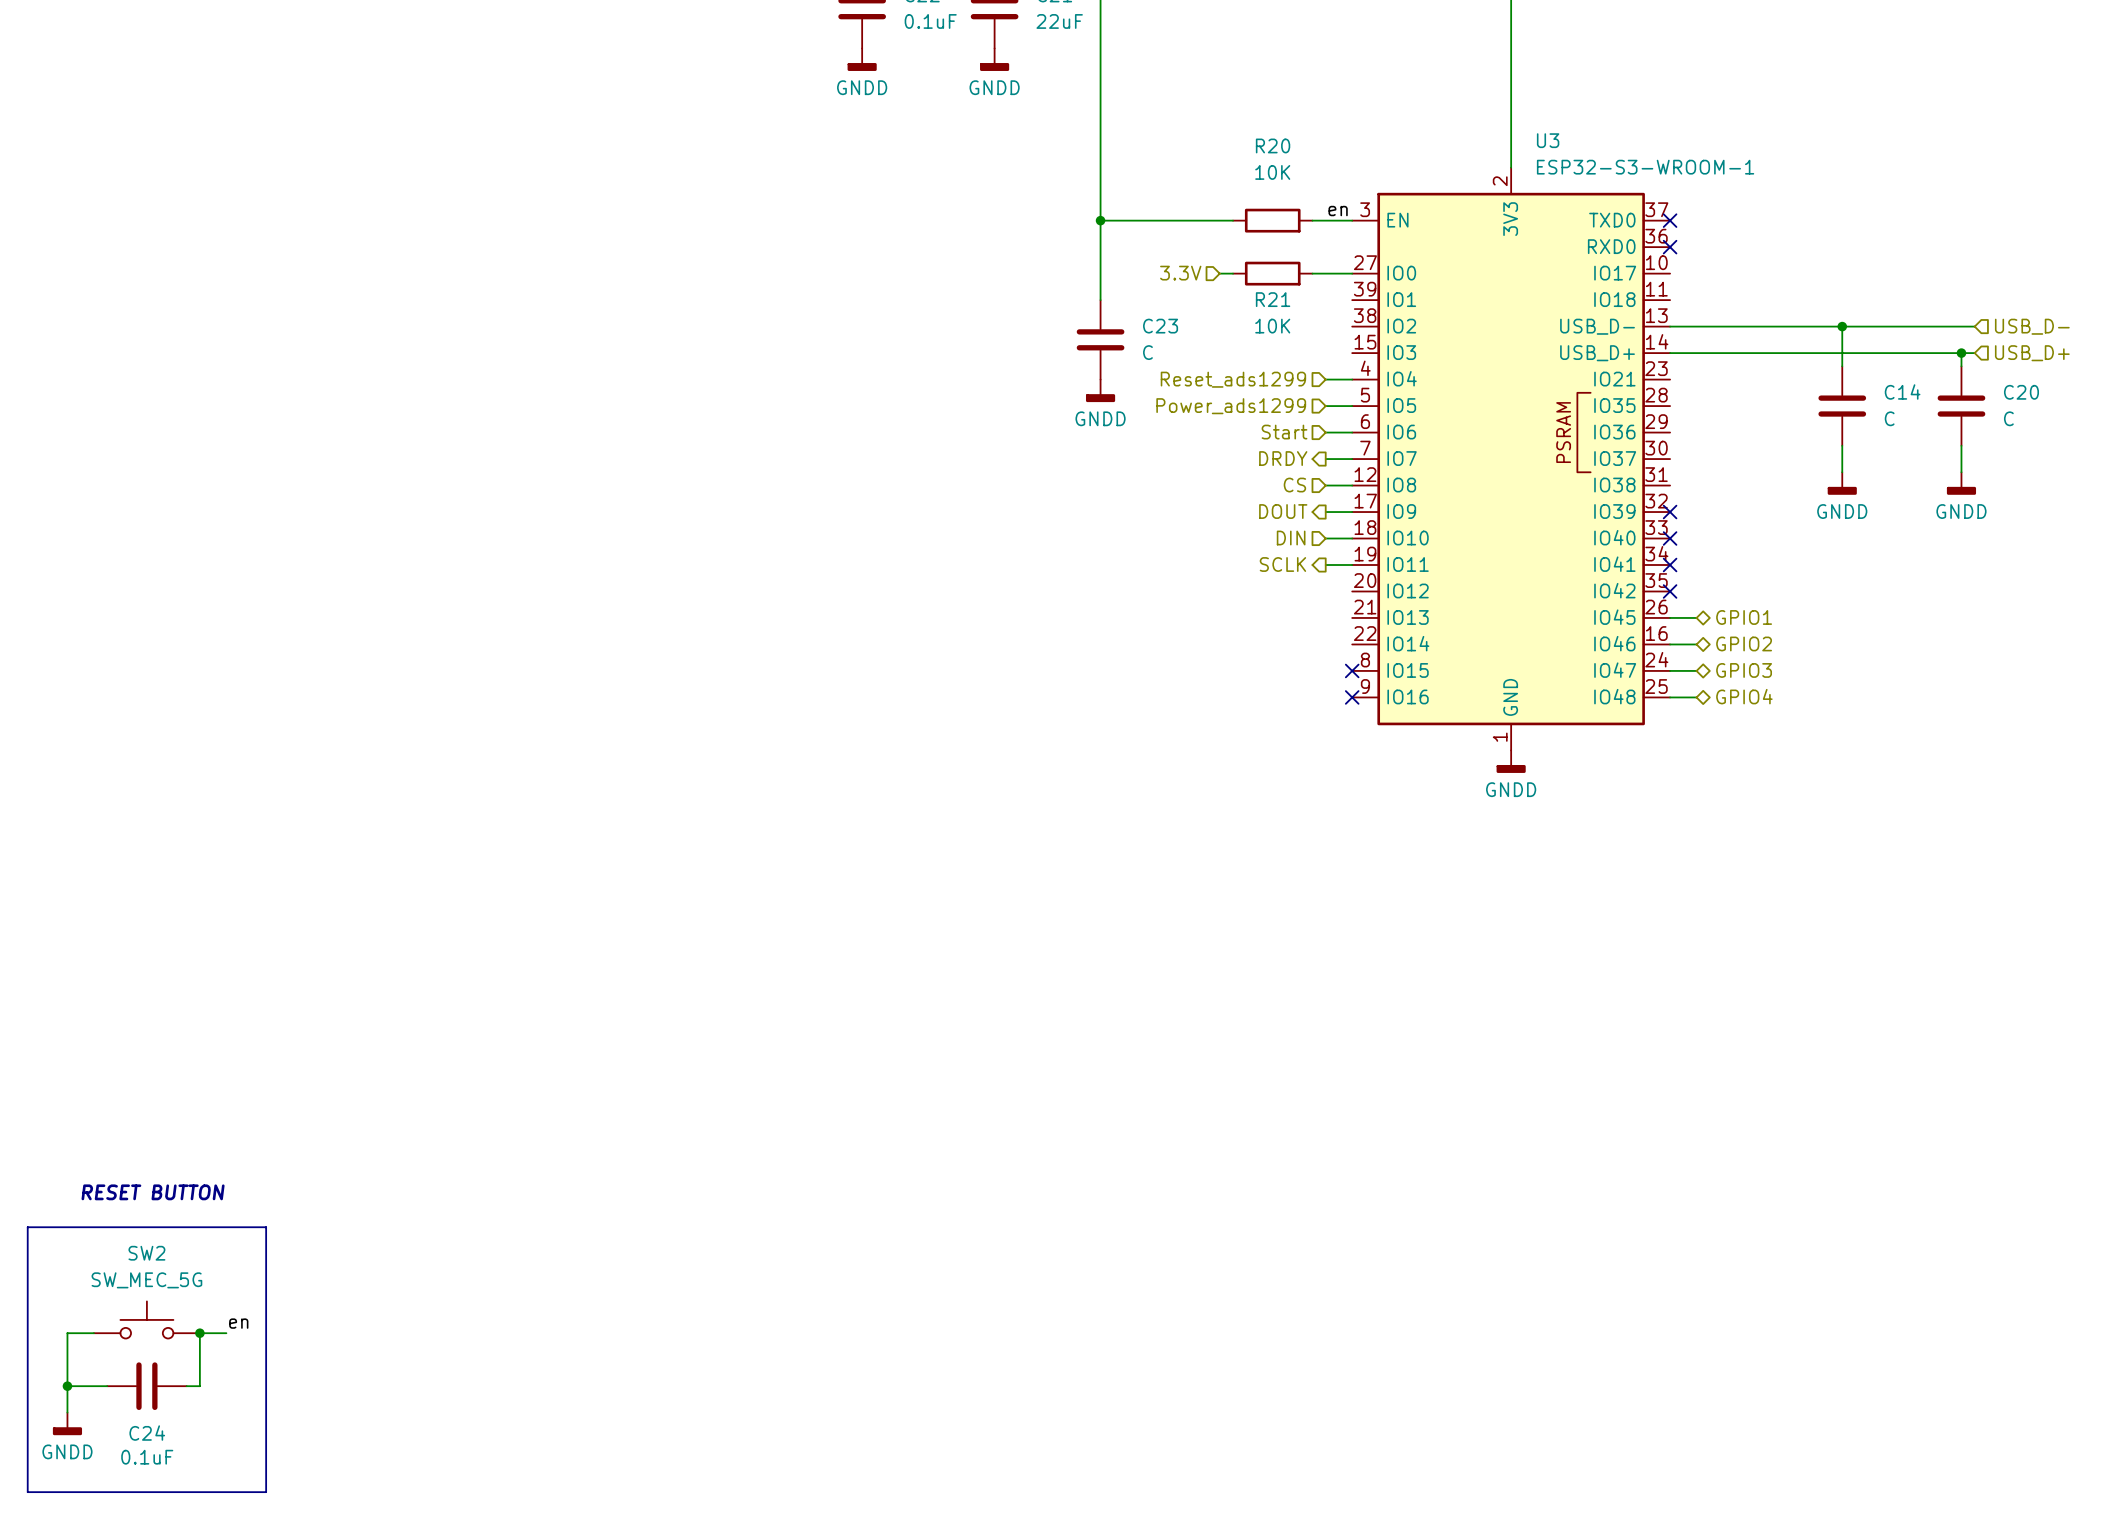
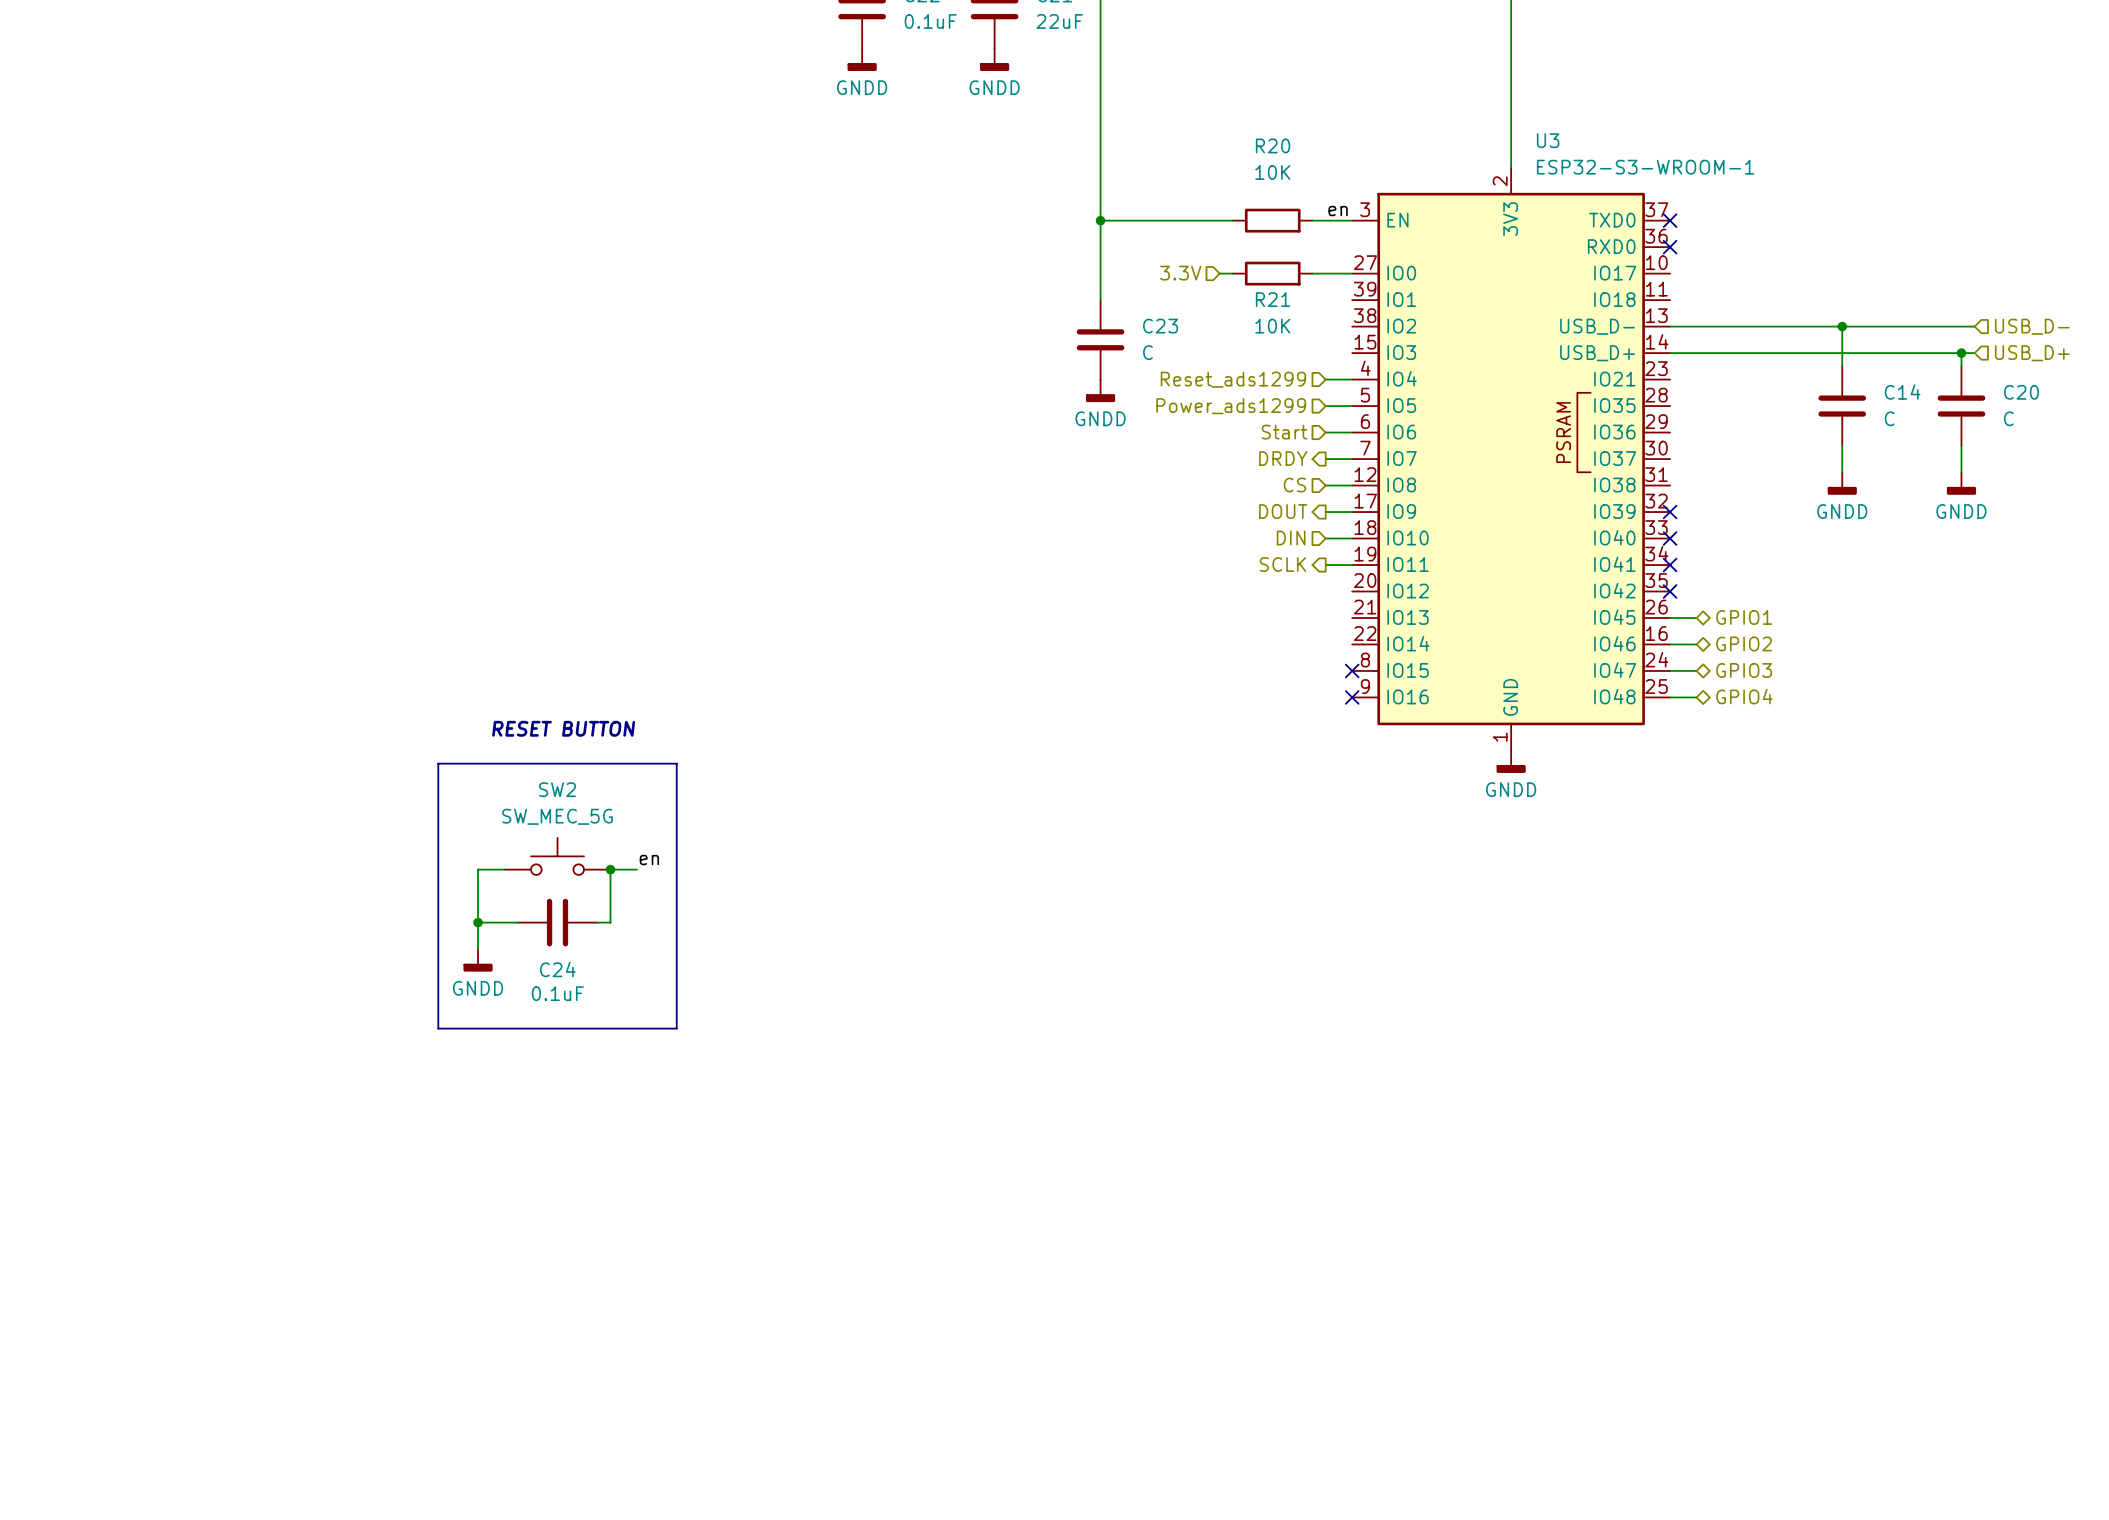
text: none -> RESET BUTTON (563, 728)
line: none -> (438, 763) (676, 763) (676, 1028) (438, 1028) (438, 763)
label: none -> en (649, 860)
wire: none -> (504, 869) (478, 869) (478, 949)
junction: none -> (610, 869)
wire: none -> (636, 869) (610, 869) (610, 922) (597, 922)
wire: none -> (478, 922) (517, 922)
junction: none -> (478, 922)
power symbol: none -> GNDD (478, 960)
text: RESET BUTTON (153, 1192) -> none
line: (27, 1227) (266, 1227) (266, 1492) (27, 1492) (27, 1227) -> none
SW2 position: (146, 1319) -> (557, 856)
label: en (238, 1323) -> none
wire: (93, 1333) (67, 1333) (67, 1412) -> none
junction: (199, 1333) -> none
wire: (226, 1333) (199, 1333) (199, 1386) (186, 1386) -> none
wire: (67, 1386) (107, 1386) -> none
junction: (67, 1386) -> none
C24 position: (146, 1386) -> (557, 922)
power symbol: GNDD (67, 1423) -> none

